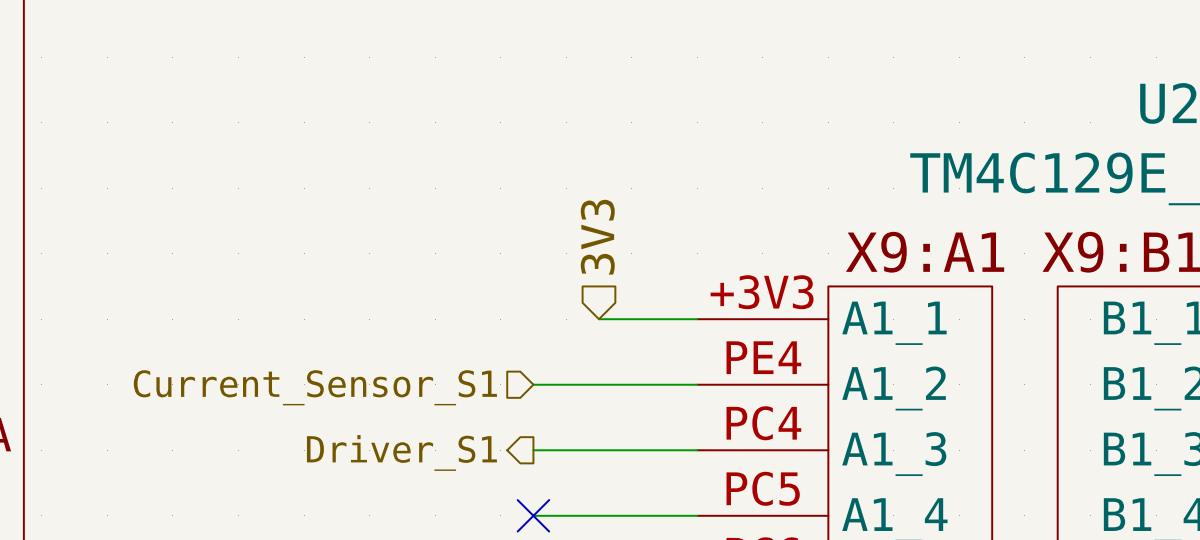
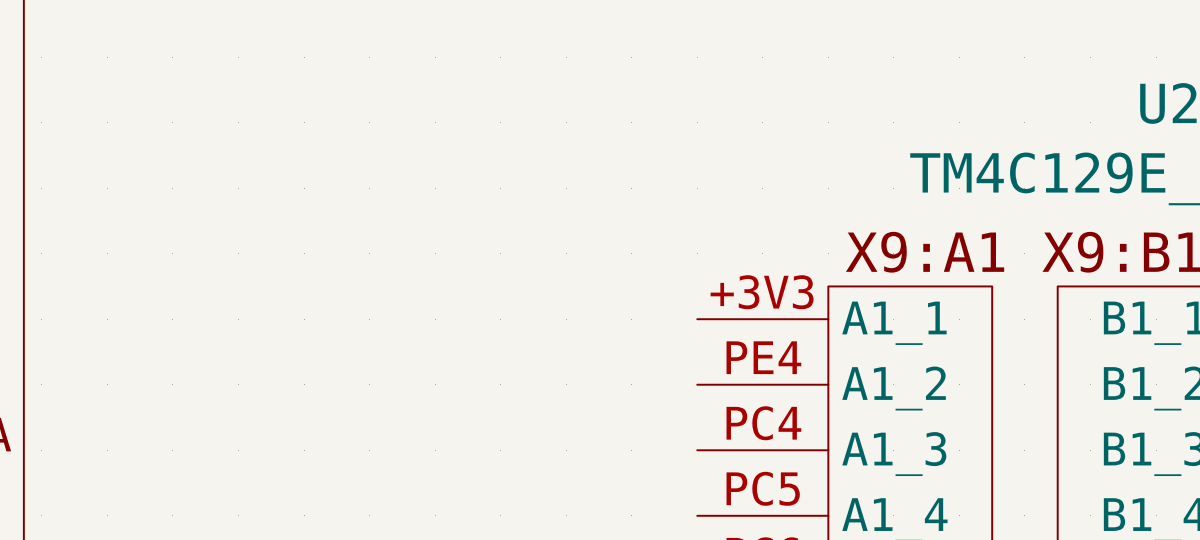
hierarchical label: 3V3 (597, 237) -> none
wire: (598, 319) (697, 319) -> none
wire: (533, 384) (697, 384) -> none
hierarchical label: Current_Sensor_S1 (315, 387) -> none
wire: (533, 450) (697, 450) -> none
hierarchical label: Driver_S1 (401, 452) -> none
wire: (533, 515) (697, 515) -> none
no-connect mark: (533, 515) -> none

